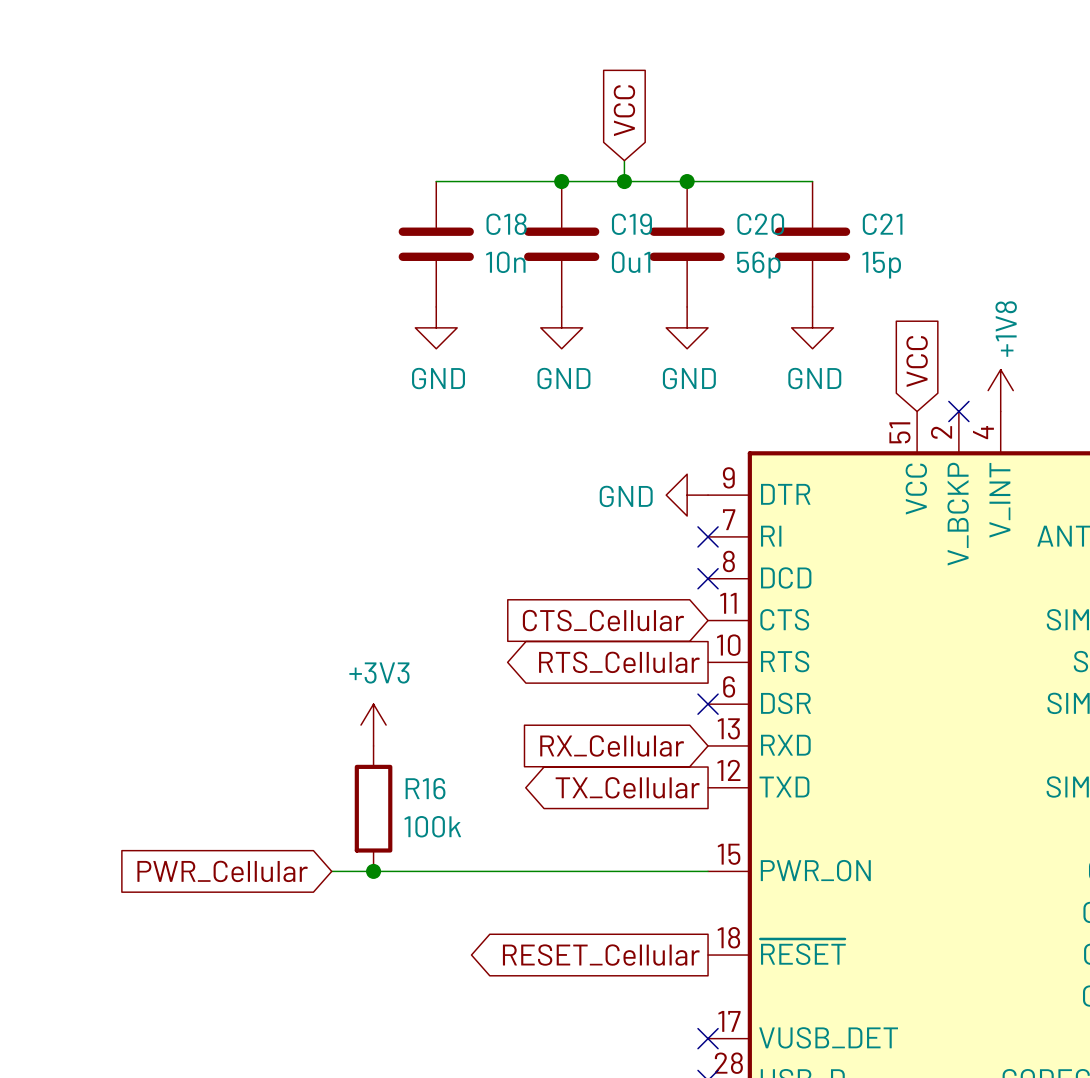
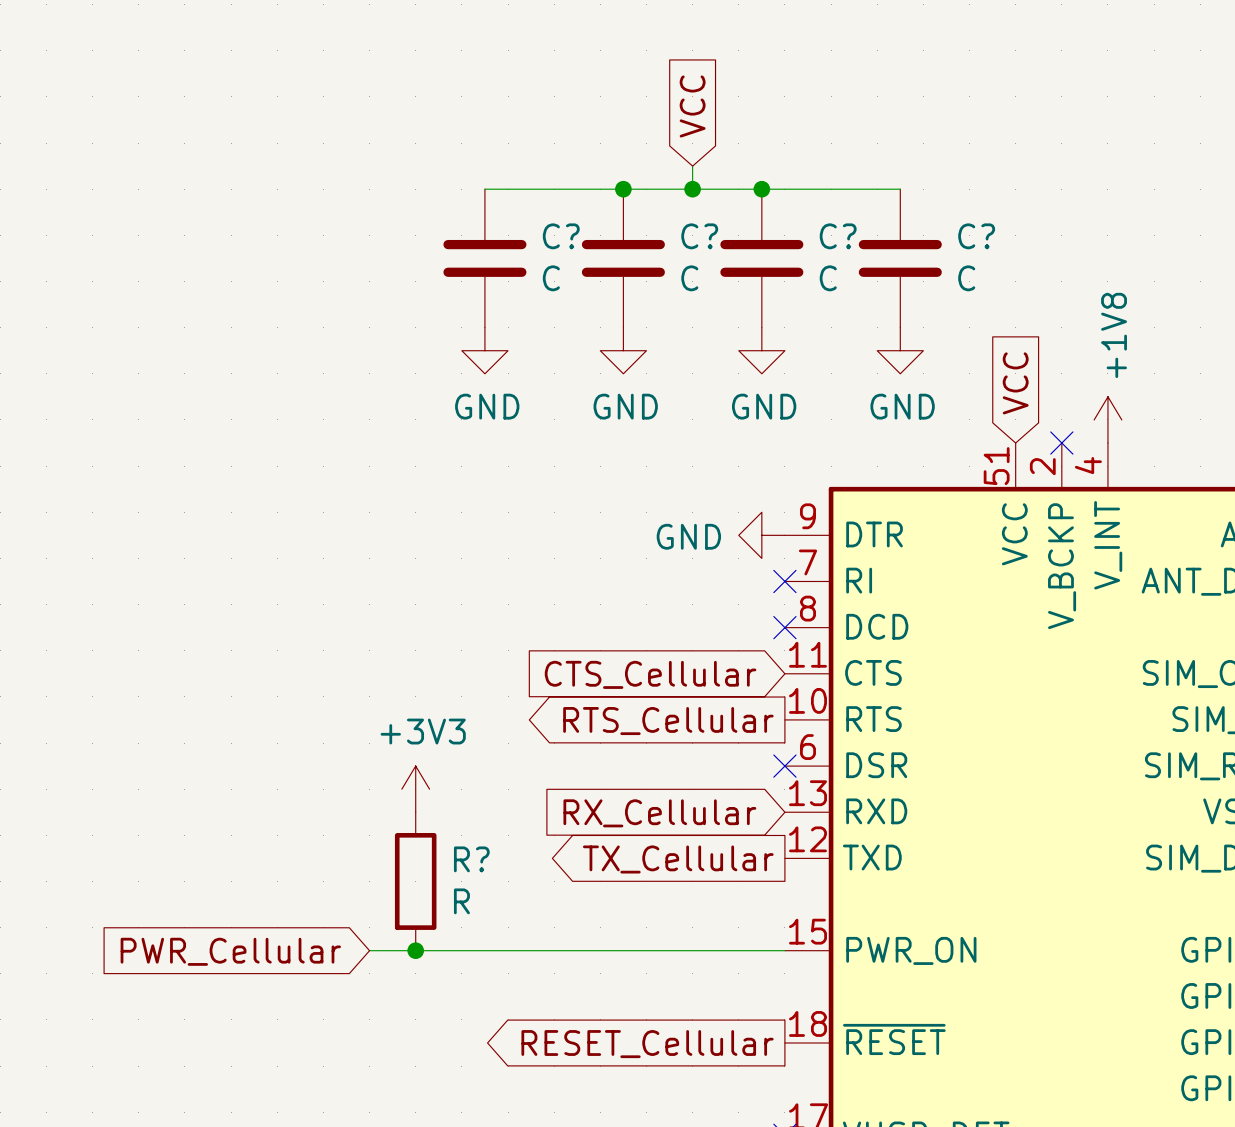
C18 name: C18 (506, 224) -> C? (561, 236)
C19 name: C19 (631, 224) -> C? (699, 236)
C20 name: C20 (760, 224) -> C? (838, 236)
C21 name: C21 (882, 224) -> C? (976, 236)
C18 value: 10n (505, 262) -> C (551, 278)
C19 value: 0u1 (631, 262) -> C (689, 278)
C20 value: 56p (758, 265) -> C (828, 278)
C21 value: 15p (881, 265) -> C (966, 278)
R16 name: R16 (425, 788) -> R? (471, 859)
R16 value: 100k (432, 826) -> R (461, 901)

